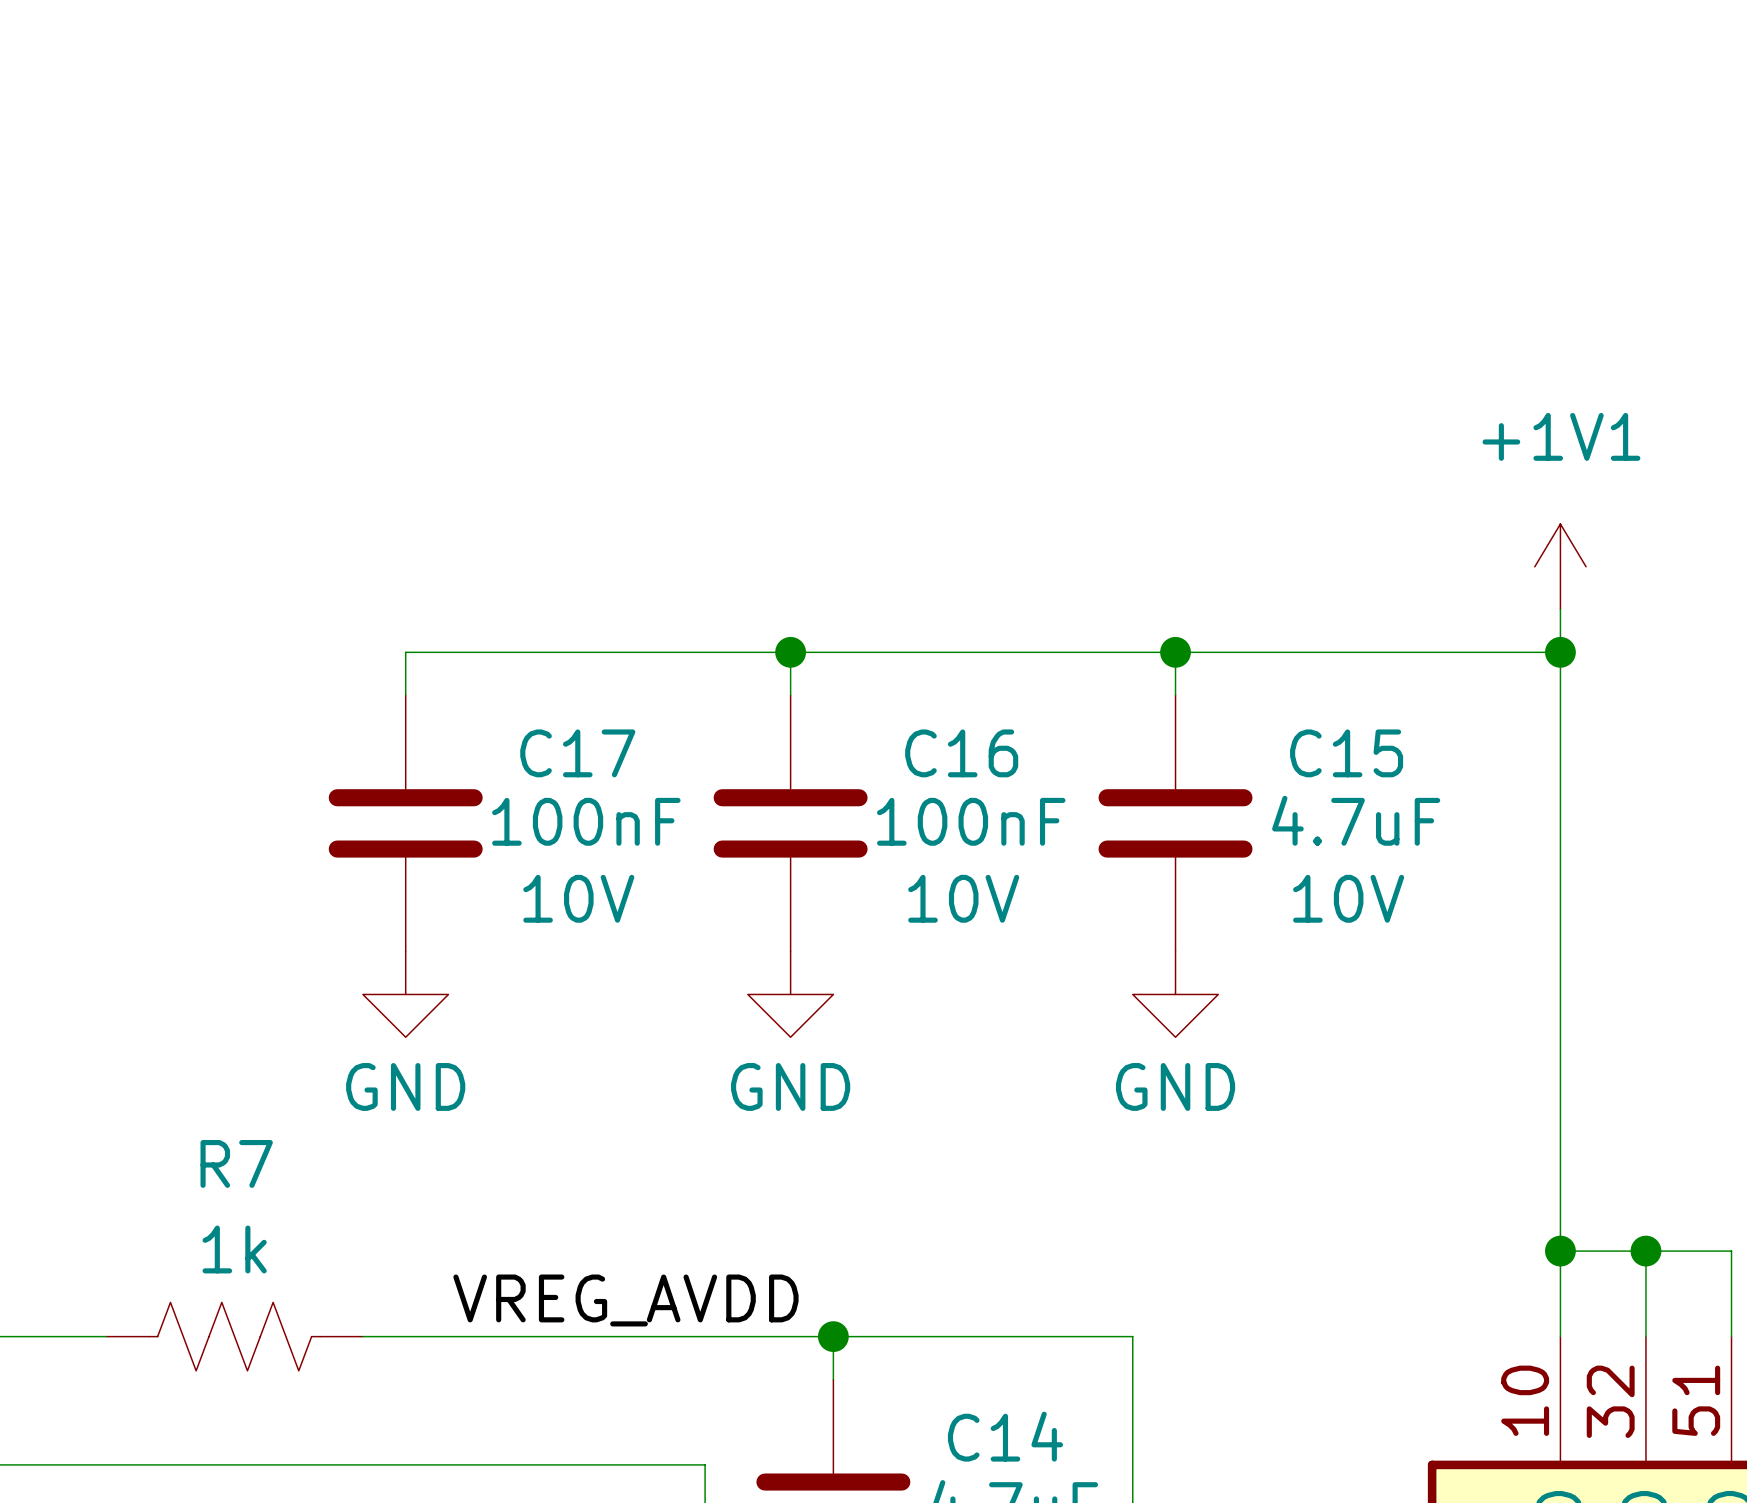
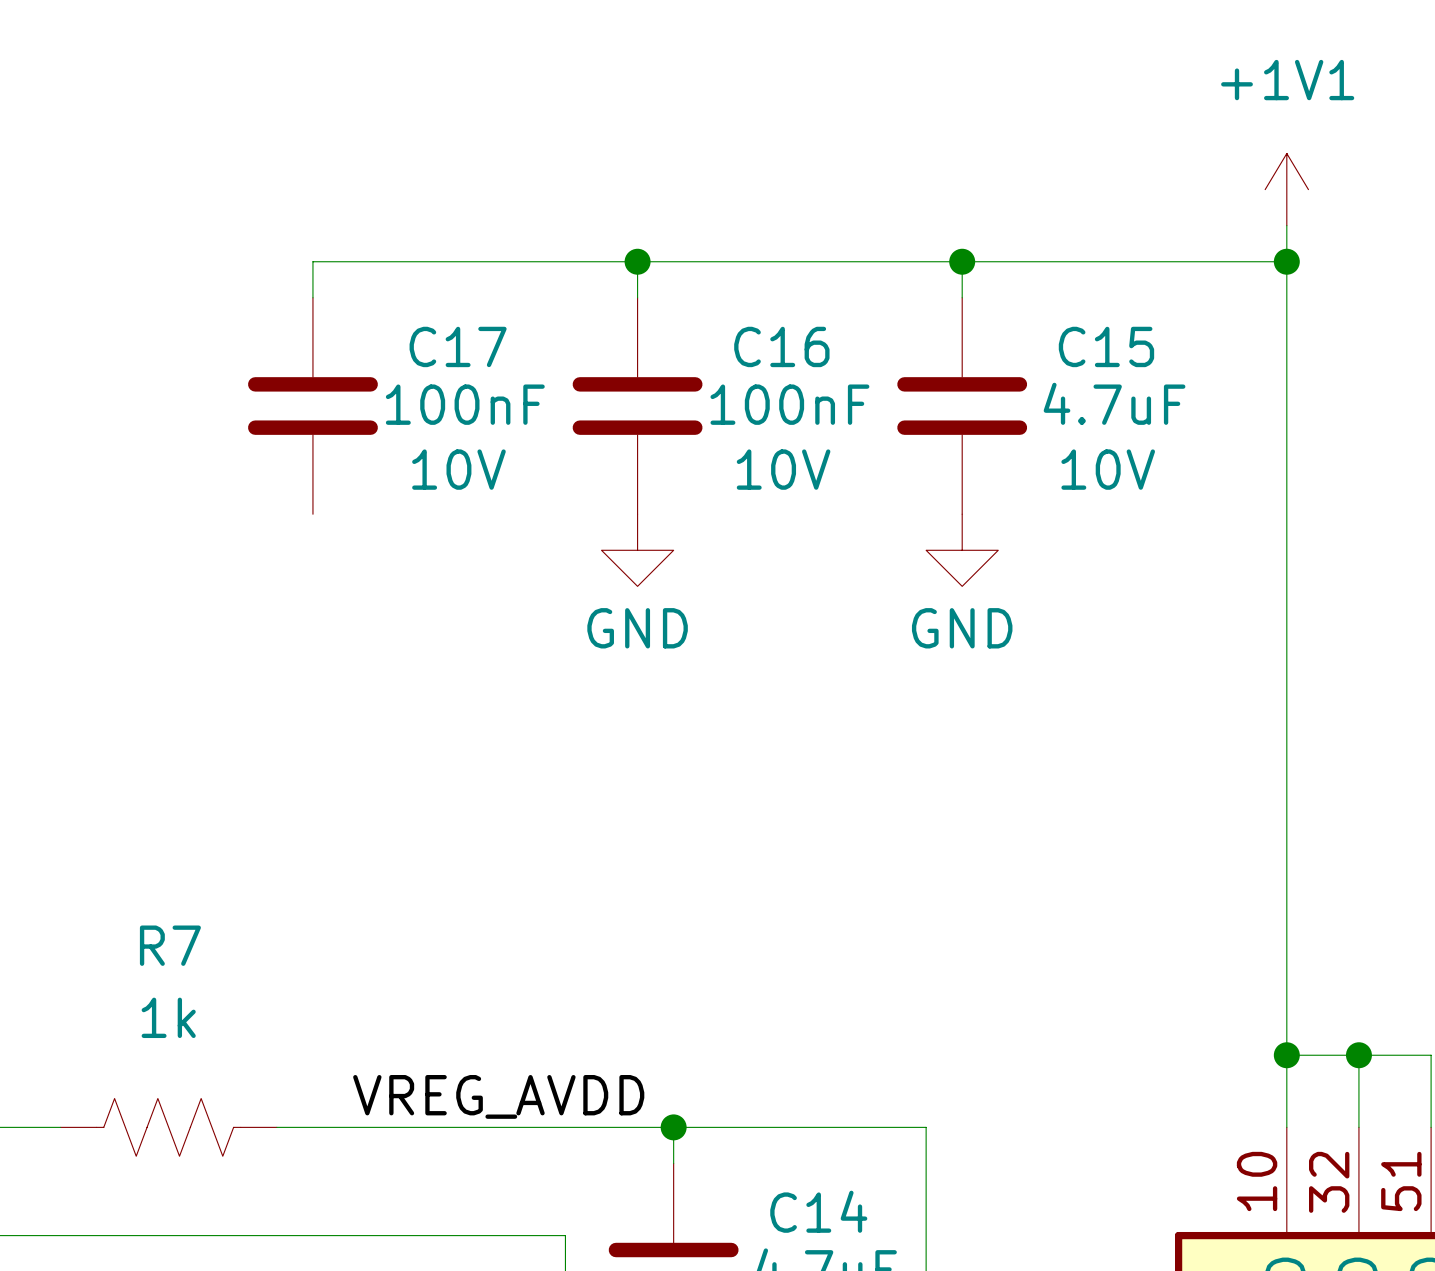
wire: none -> (1286, 225) (1286, 514)
junction: none -> (637, 261)
junction: none -> (962, 261)
junction: none -> (1286, 261)
power symbol position: +1V1 (1560, 566) -> +1V1 (1286, 189)
wire: (790, 652) (790, 695) -> (637, 261) (637, 297)
junction: (790, 652) -> none
power symbol: none -> GND (637, 550)
wire: (1175, 652) (1175, 695) -> (962, 261) (962, 297)
junction: (1175, 652) -> none
power symbol: none -> GND (962, 550)
wire: (1560, 652) (405, 652) (405, 695) -> (1286, 261) (312, 261) (312, 297)
junction: (1560, 652) -> none
C17 position: (405, 823) -> (312, 406)
C16 position: (790, 823) -> (637, 406)
C15 position: (1175, 823) -> (962, 406)
power symbol: GND (405, 994) -> none
power symbol: GND (790, 994) -> none
power symbol: GND (1175, 994) -> none
R7 name position: R7 (236, 1163) -> R7 (170, 945)
R7 value position: 1k (234, 1249) -> 1k (168, 1017)

